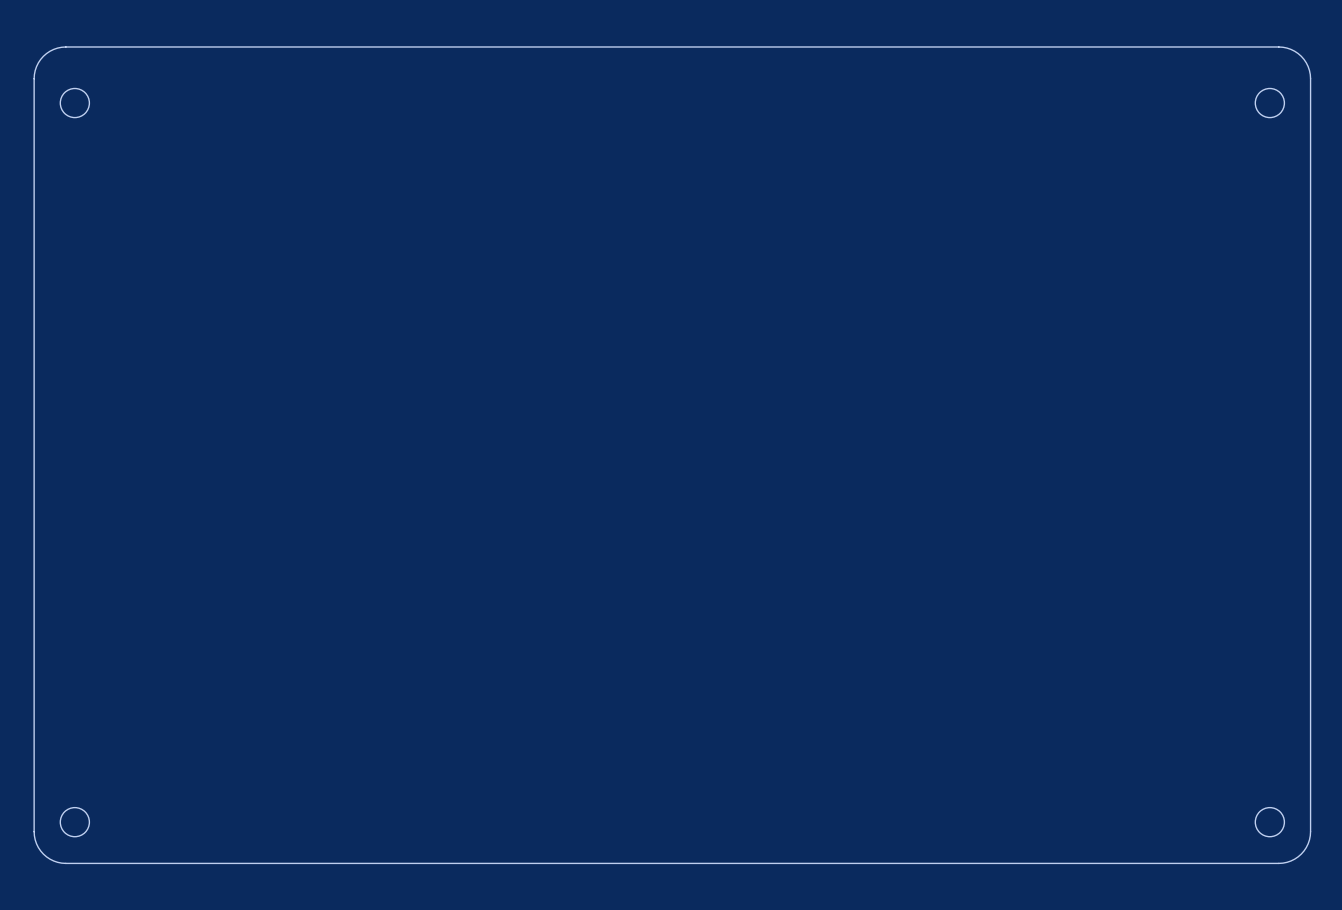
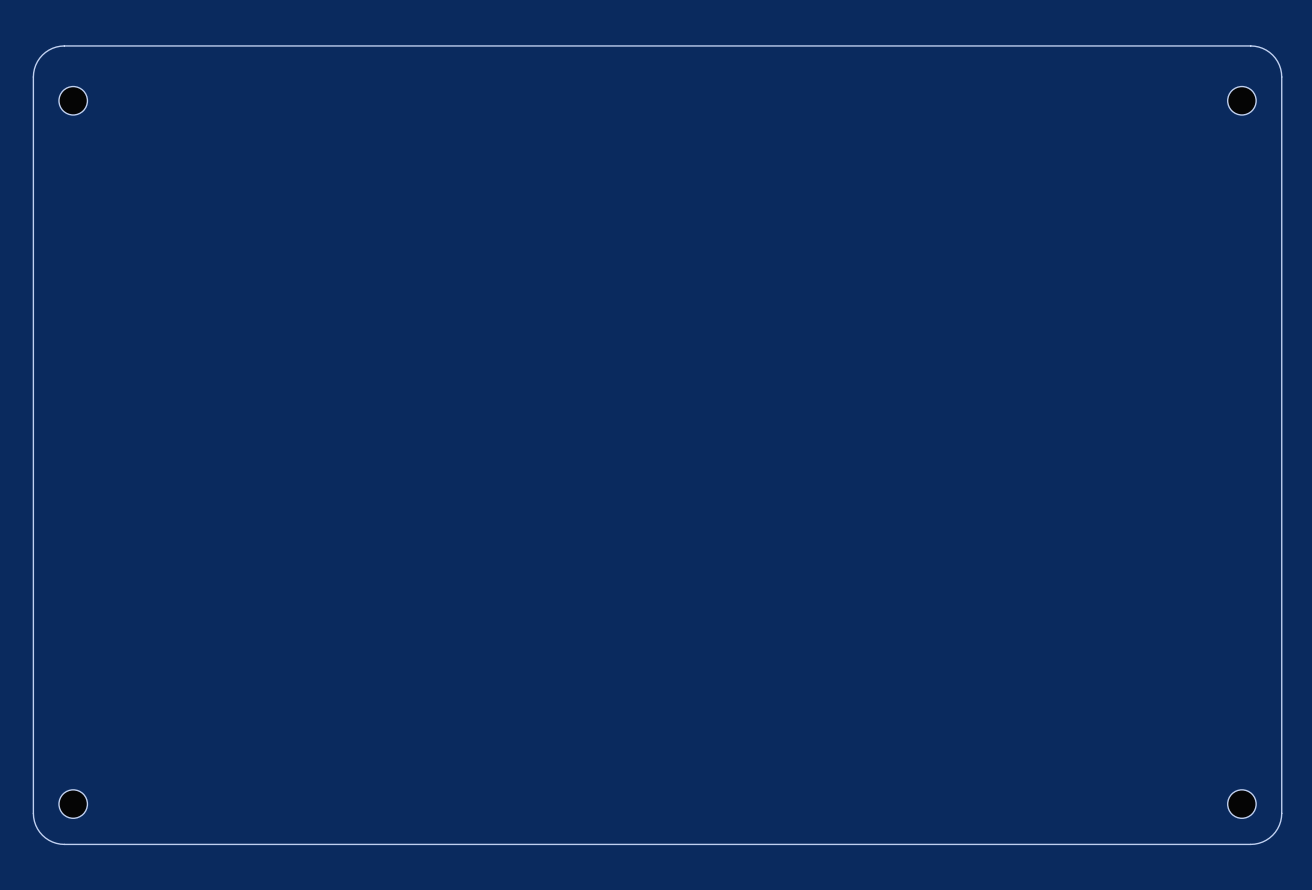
round board edge: [59, 87, 90, 119] -> none
round board edge: [1254, 87, 1285, 119] -> none
part: none -> (73, 100)
part: none -> (1241, 100)
round board edge: [59, 807, 90, 838] -> none
round board edge: [1254, 807, 1285, 838] -> none
part: none -> (73, 804)
part: none -> (1241, 804)

